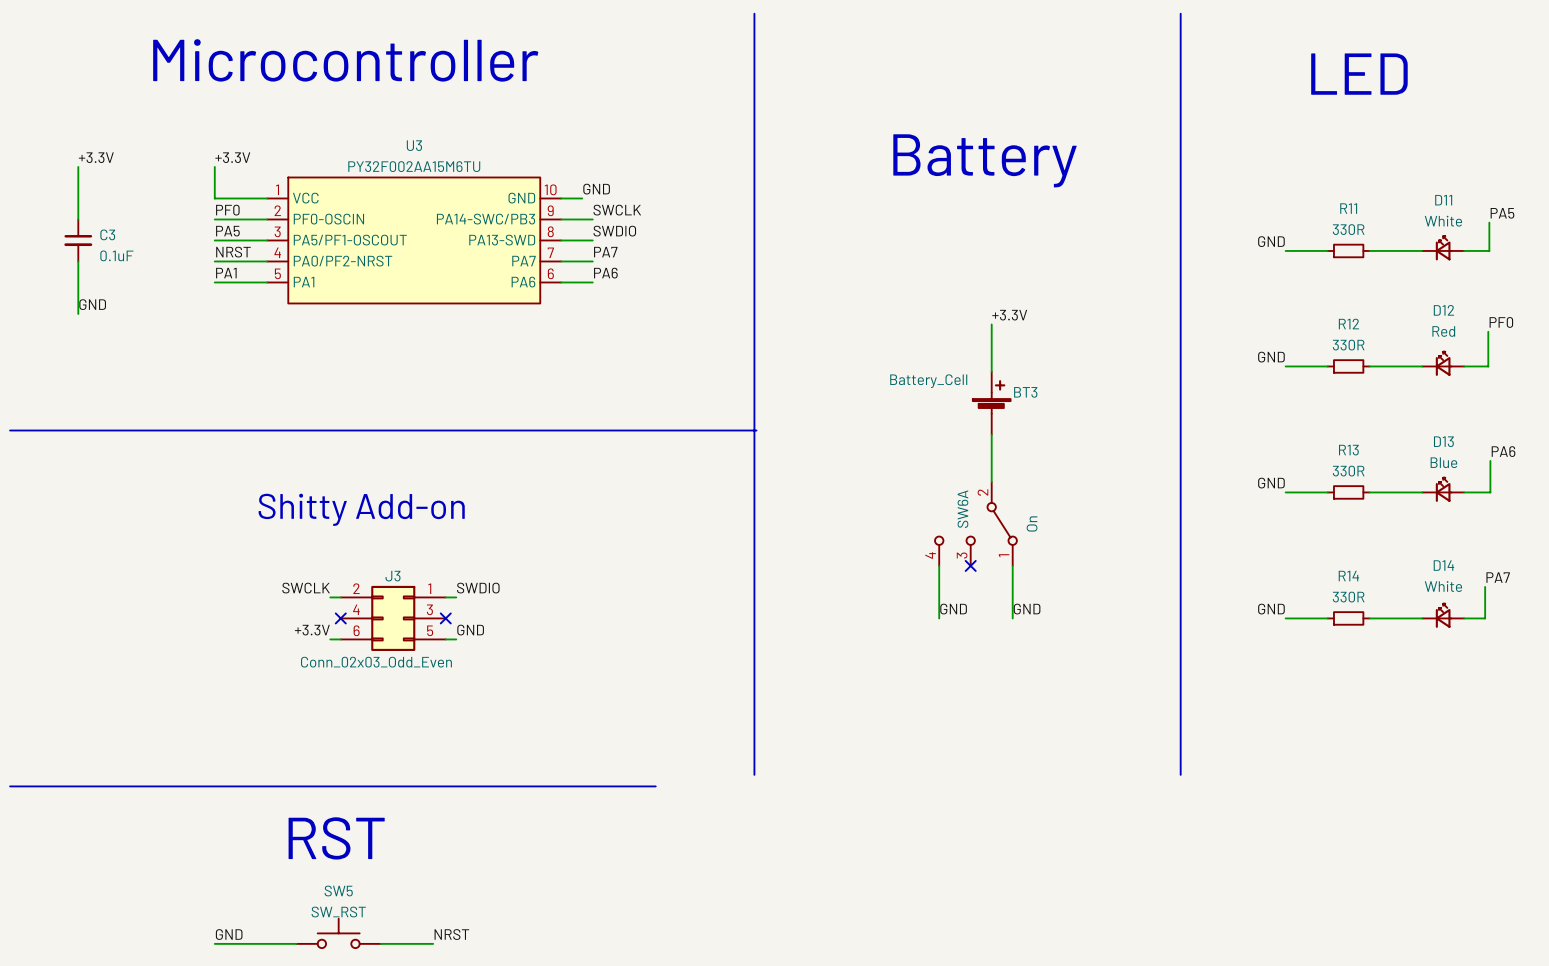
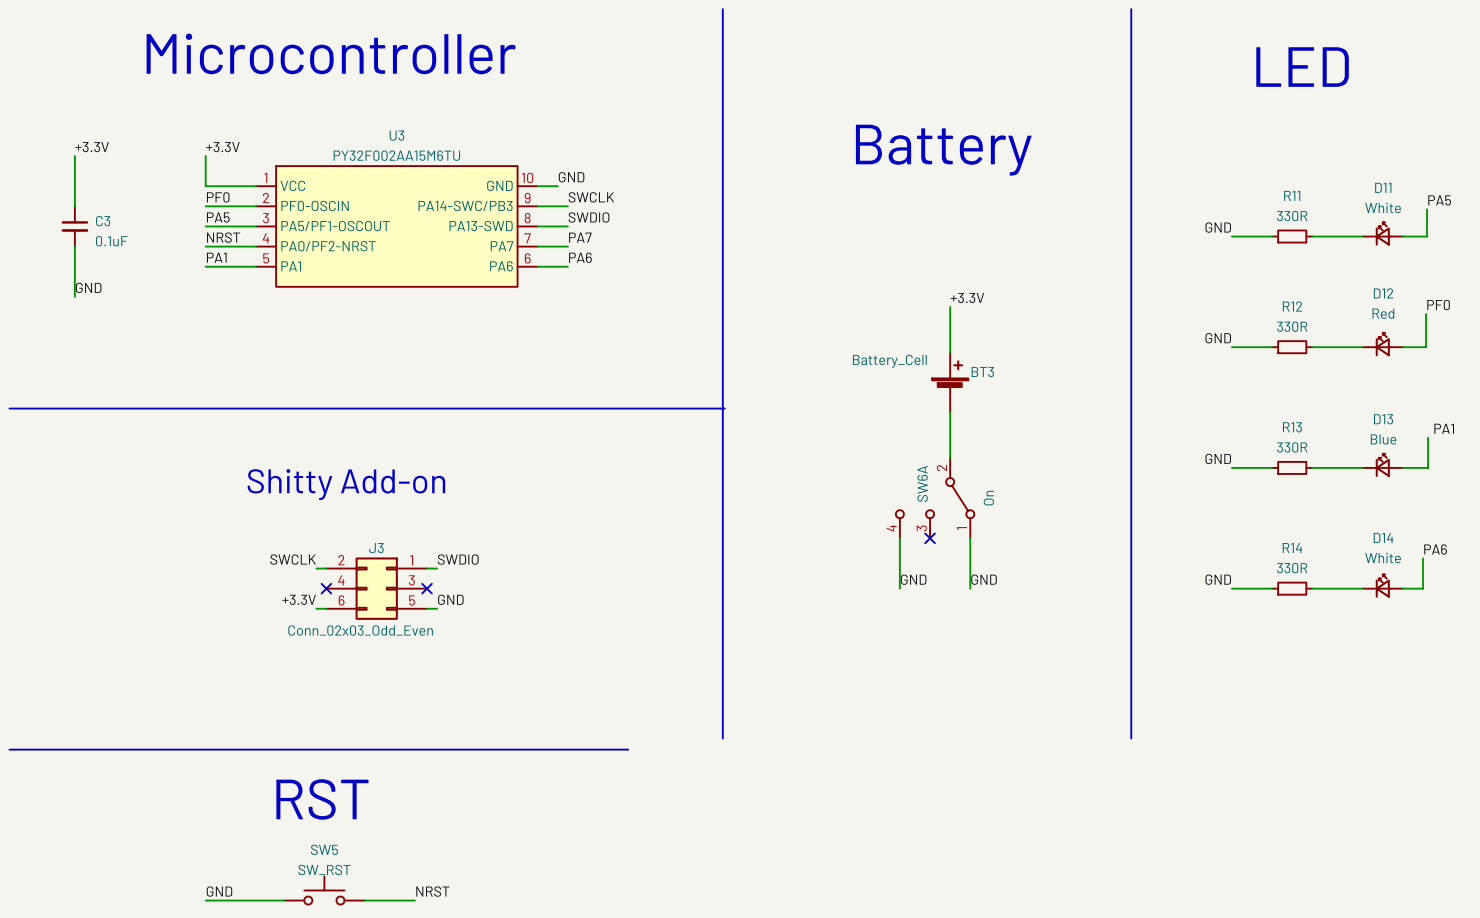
label: PA6 (1503, 451) -> PA1 (1444, 428)
label: PA7 (1498, 577) -> PA6 (1435, 549)

